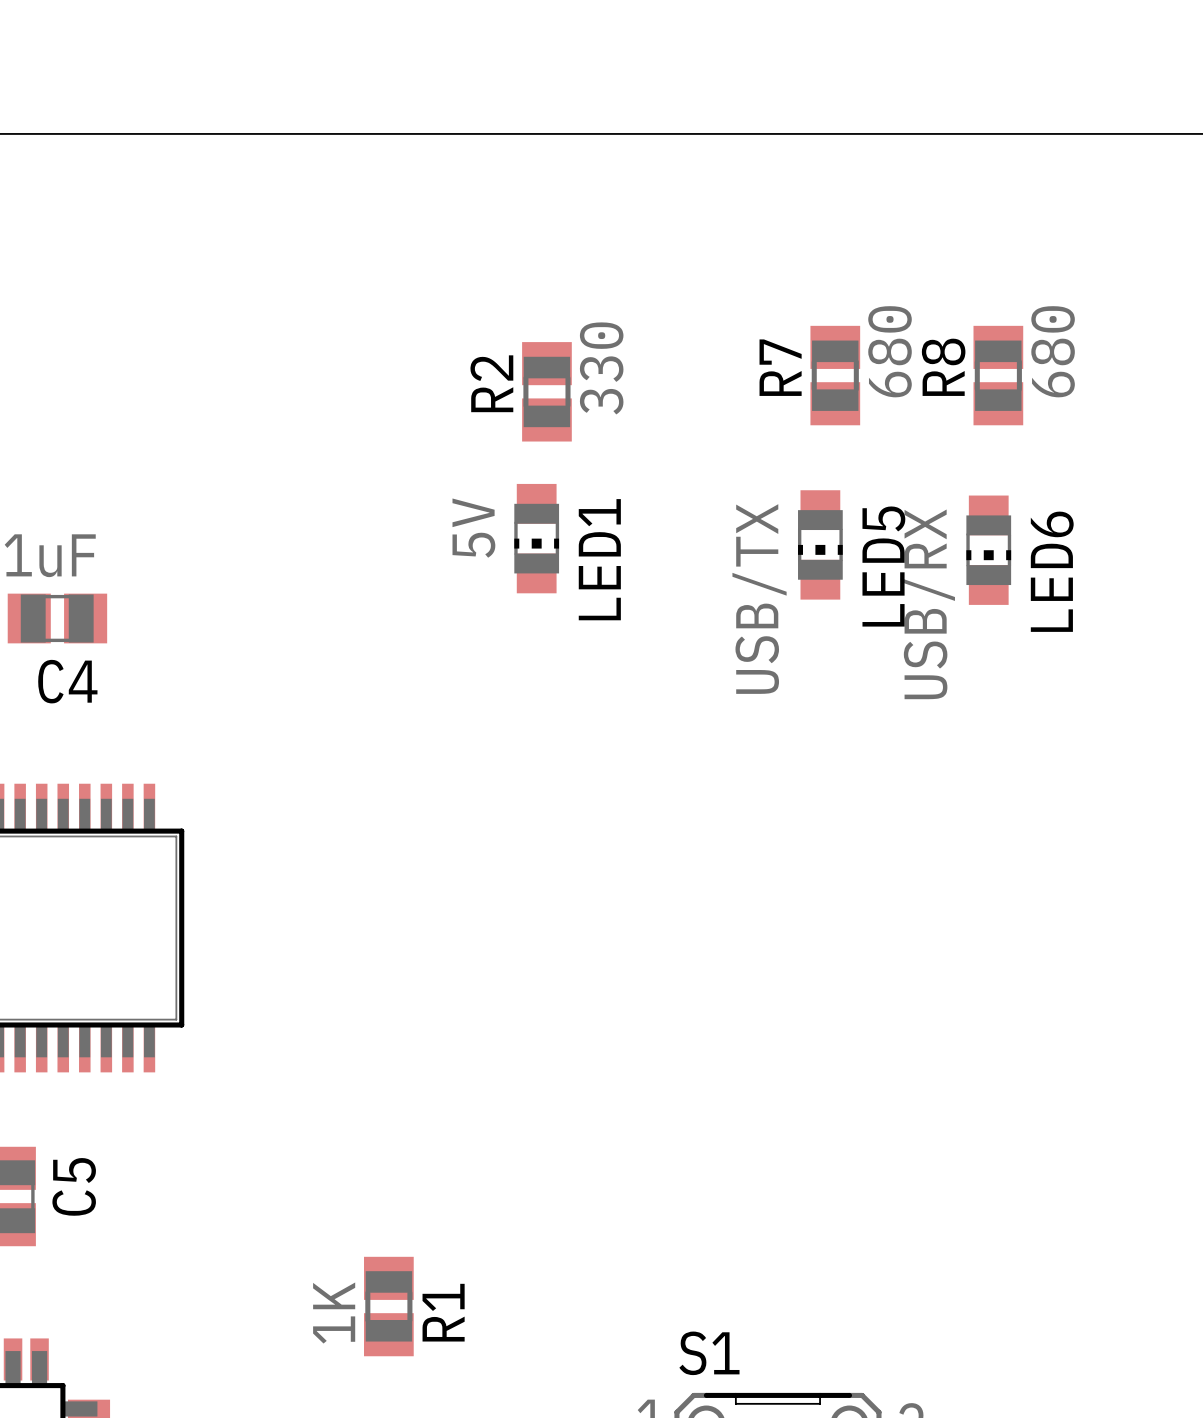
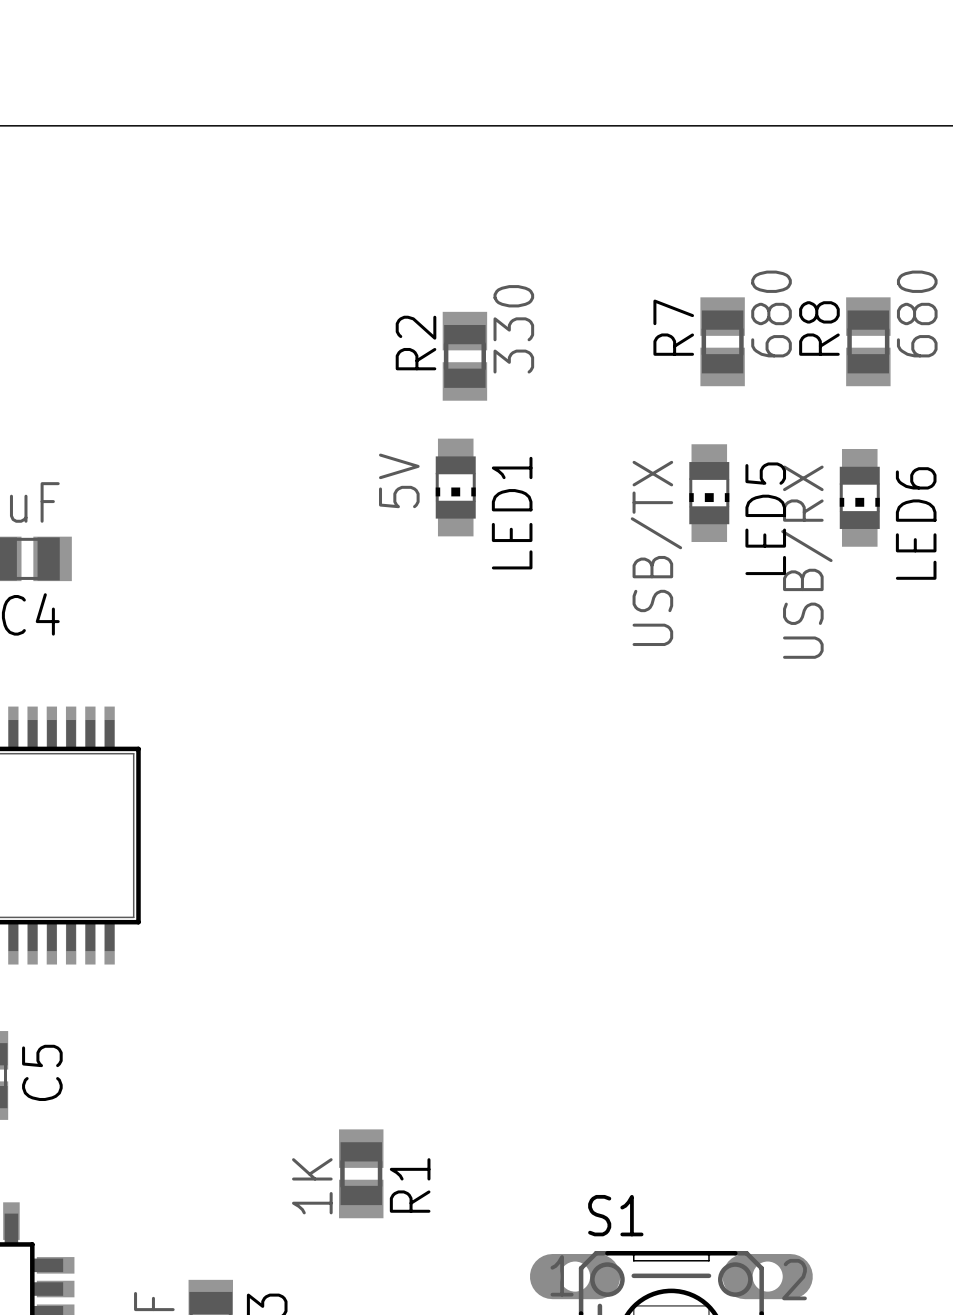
R1 position: (388, 1306) -> (361, 1173)

